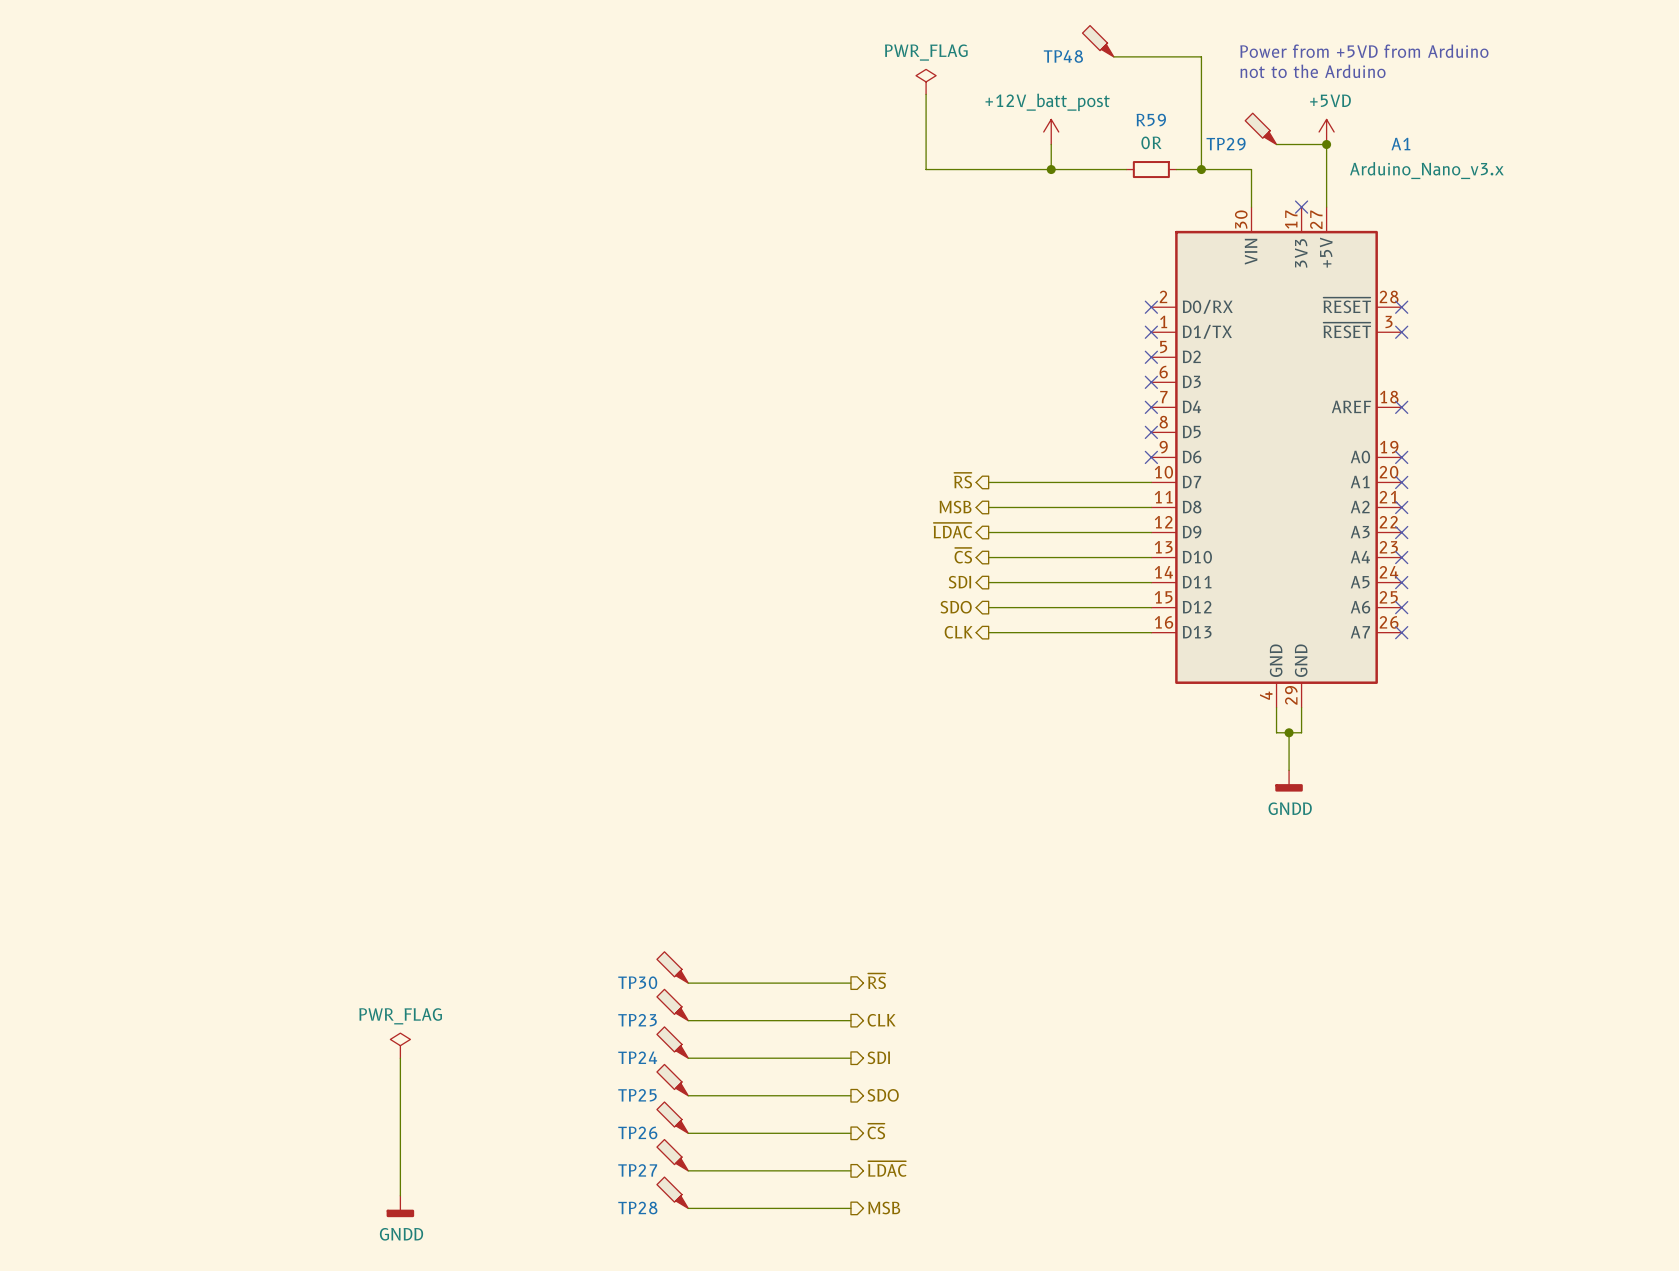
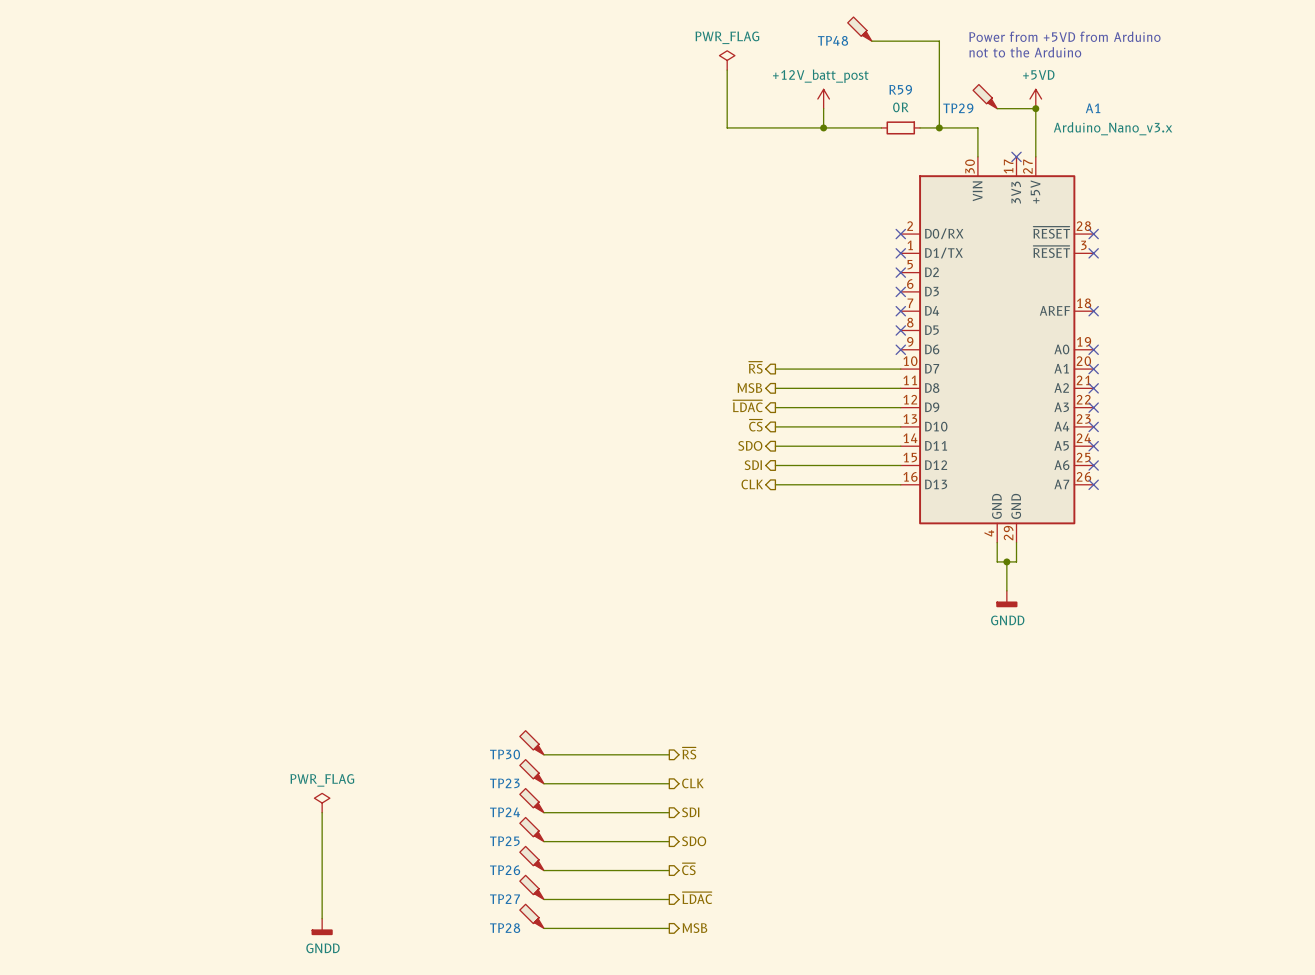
hierarchical label: SDI (959, 582) -> SDO (750, 445)
hierarchical label: SDO (956, 607) -> SDI (753, 465)

